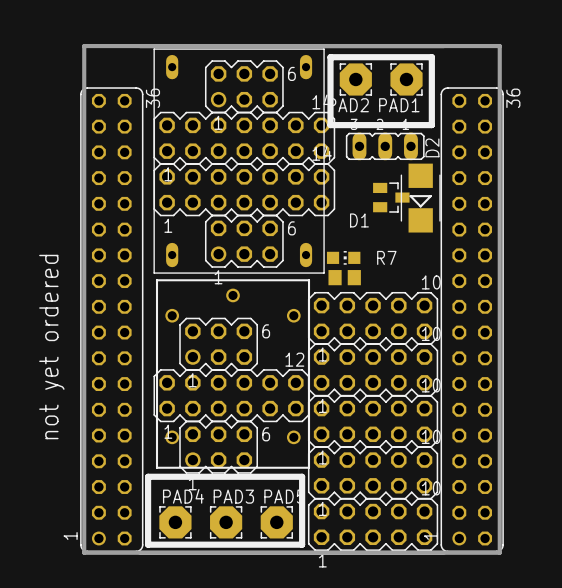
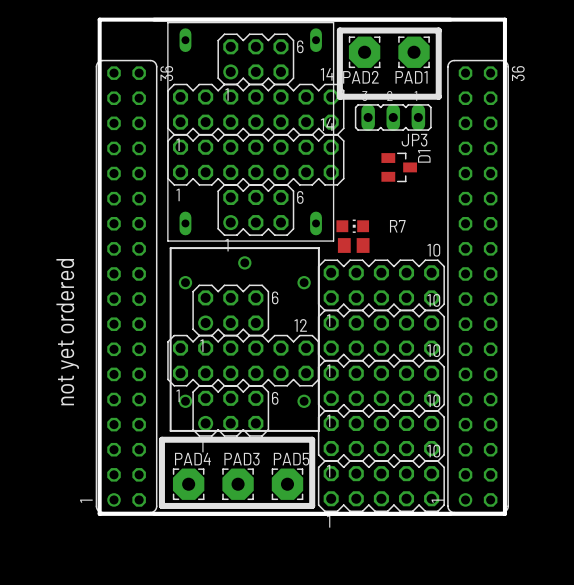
JP3 name: none -> JP3 (414, 140)
D2: (420, 198) -> none
D1 name rotation: 0° (359, 220) -> 90° counterclockwise (424, 156)
D1 name position: D1 (359, 220) -> D1 (424, 156)

